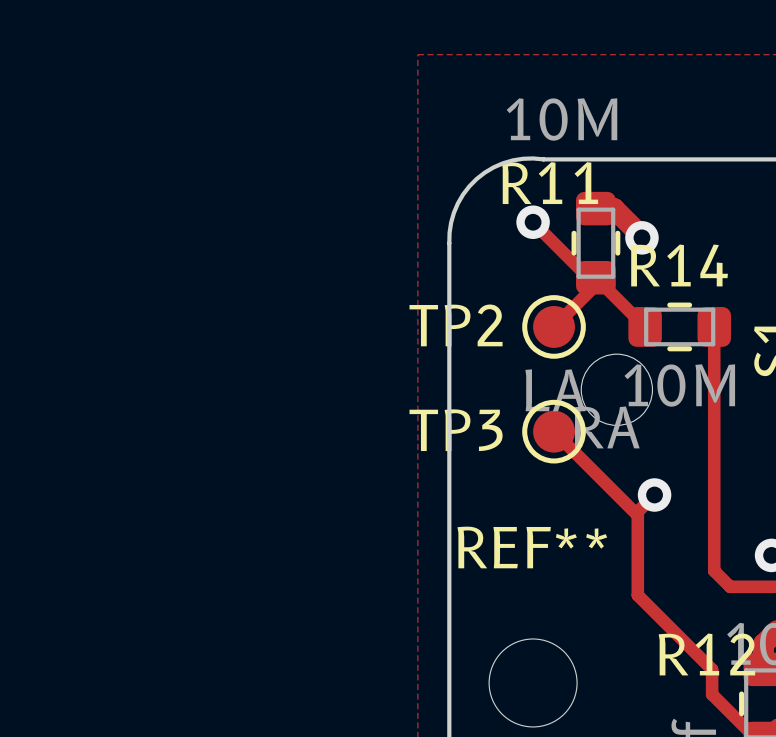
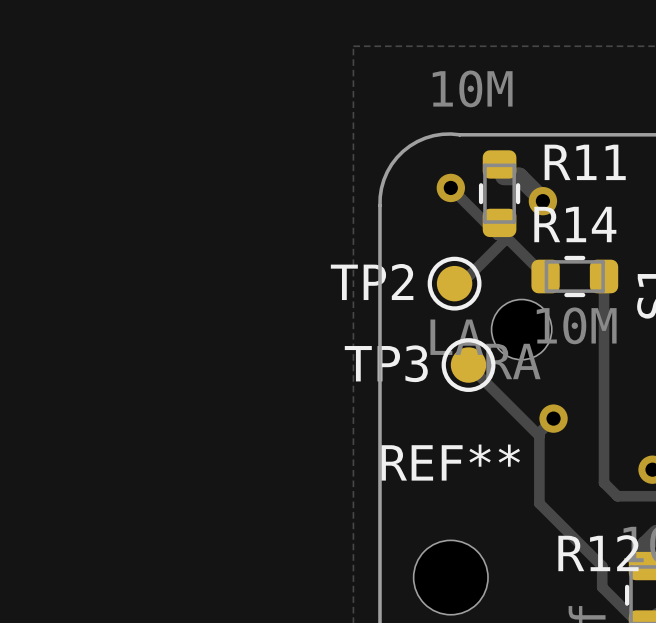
R11 name position: R11 (549, 183) -> R11 (585, 162)
R11 position: (595, 243) -> (499, 193)
TP2 position: (554, 326) -> (454, 283)

